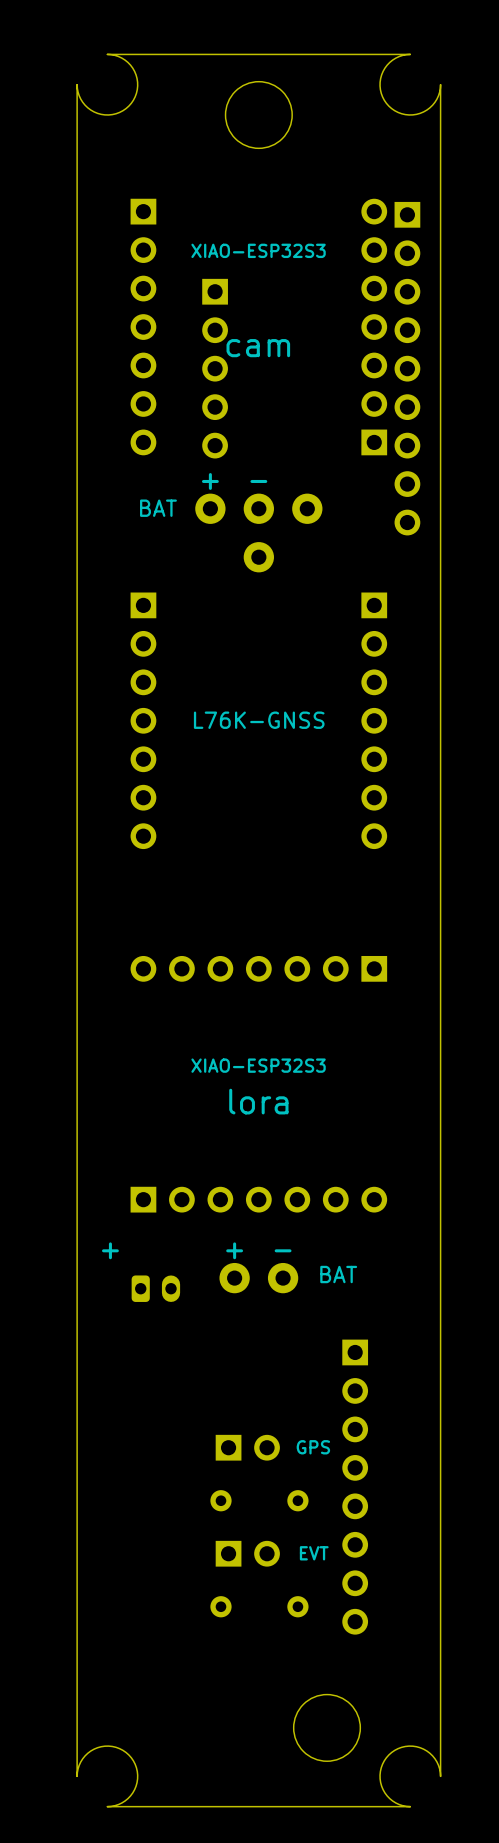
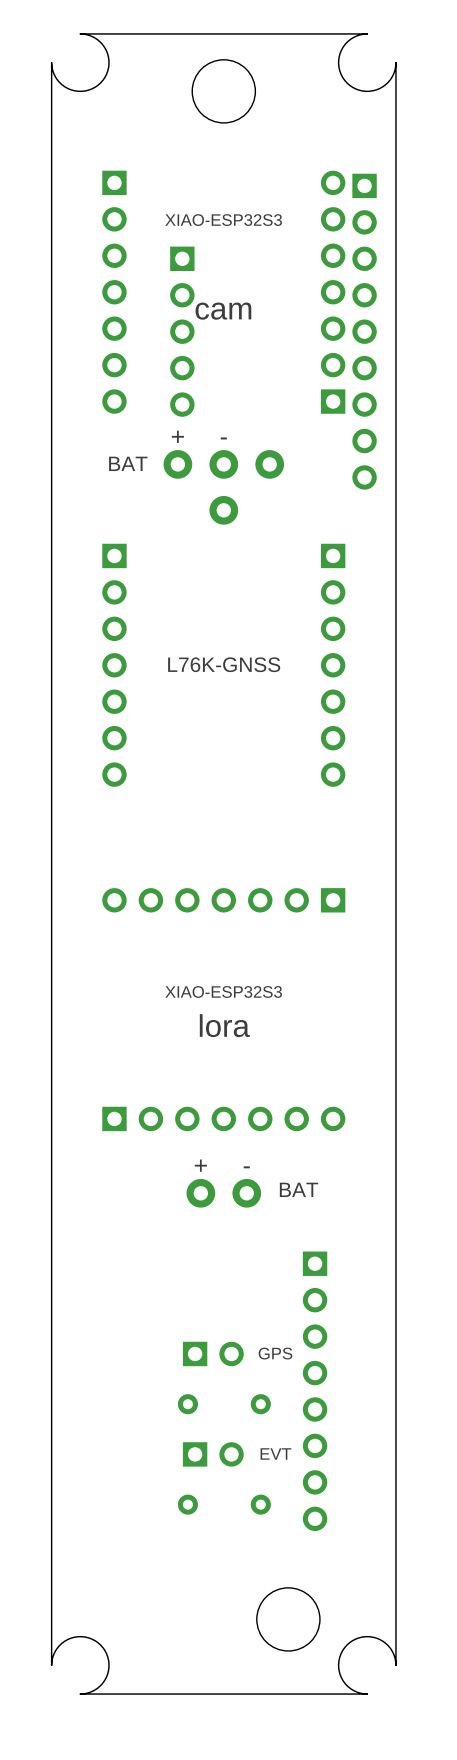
text: + (110, 1250) -> none
part: (155, 1288) -> none

